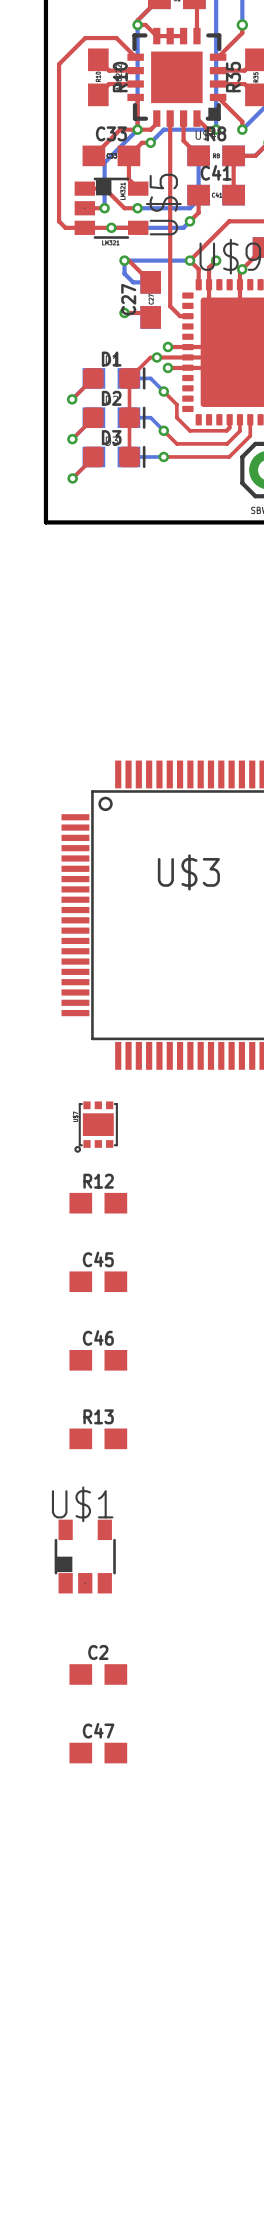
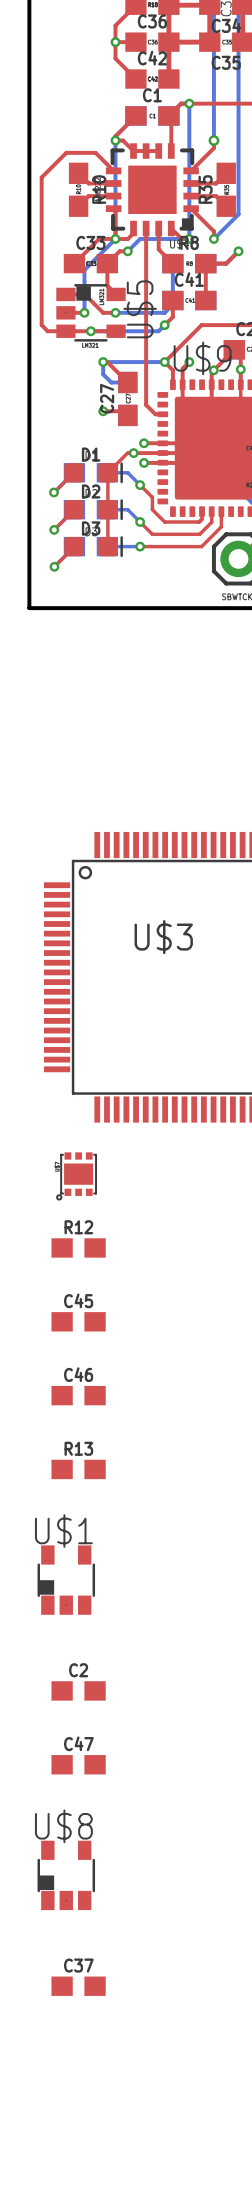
U$8: none -> (66, 1875)
C37: none -> (78, 1986)

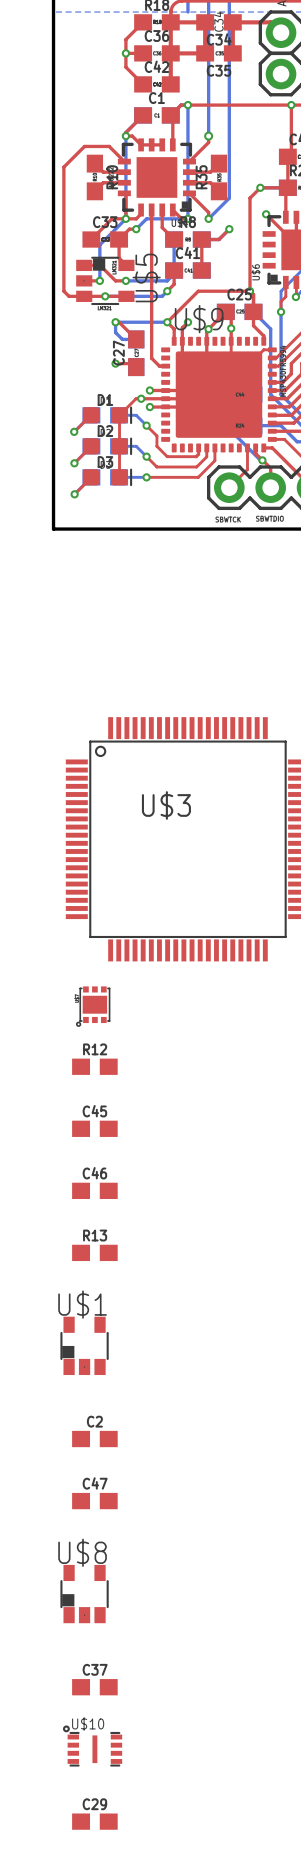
U$10: none -> (92, 1746)
C29: none -> (94, 1821)

